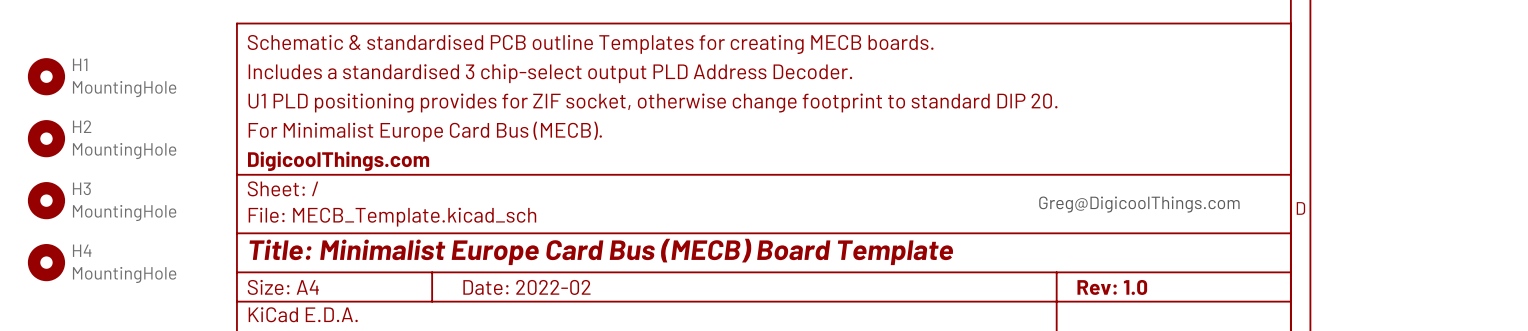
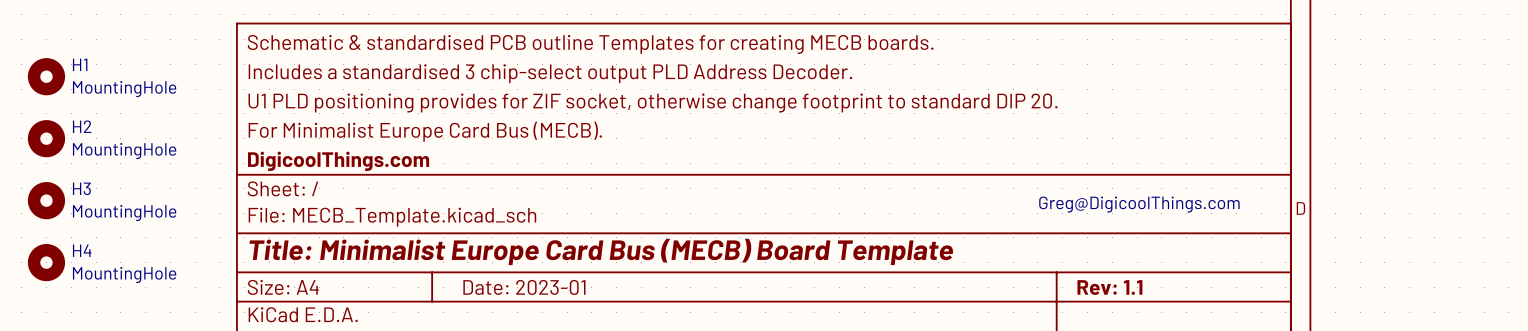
title block: Date: 2022-02 (526, 287) -> Date: 2023-01 (524, 287)
title block: Rev: 1.0 (1112, 287) -> Rev: 1.1 (1109, 287)

